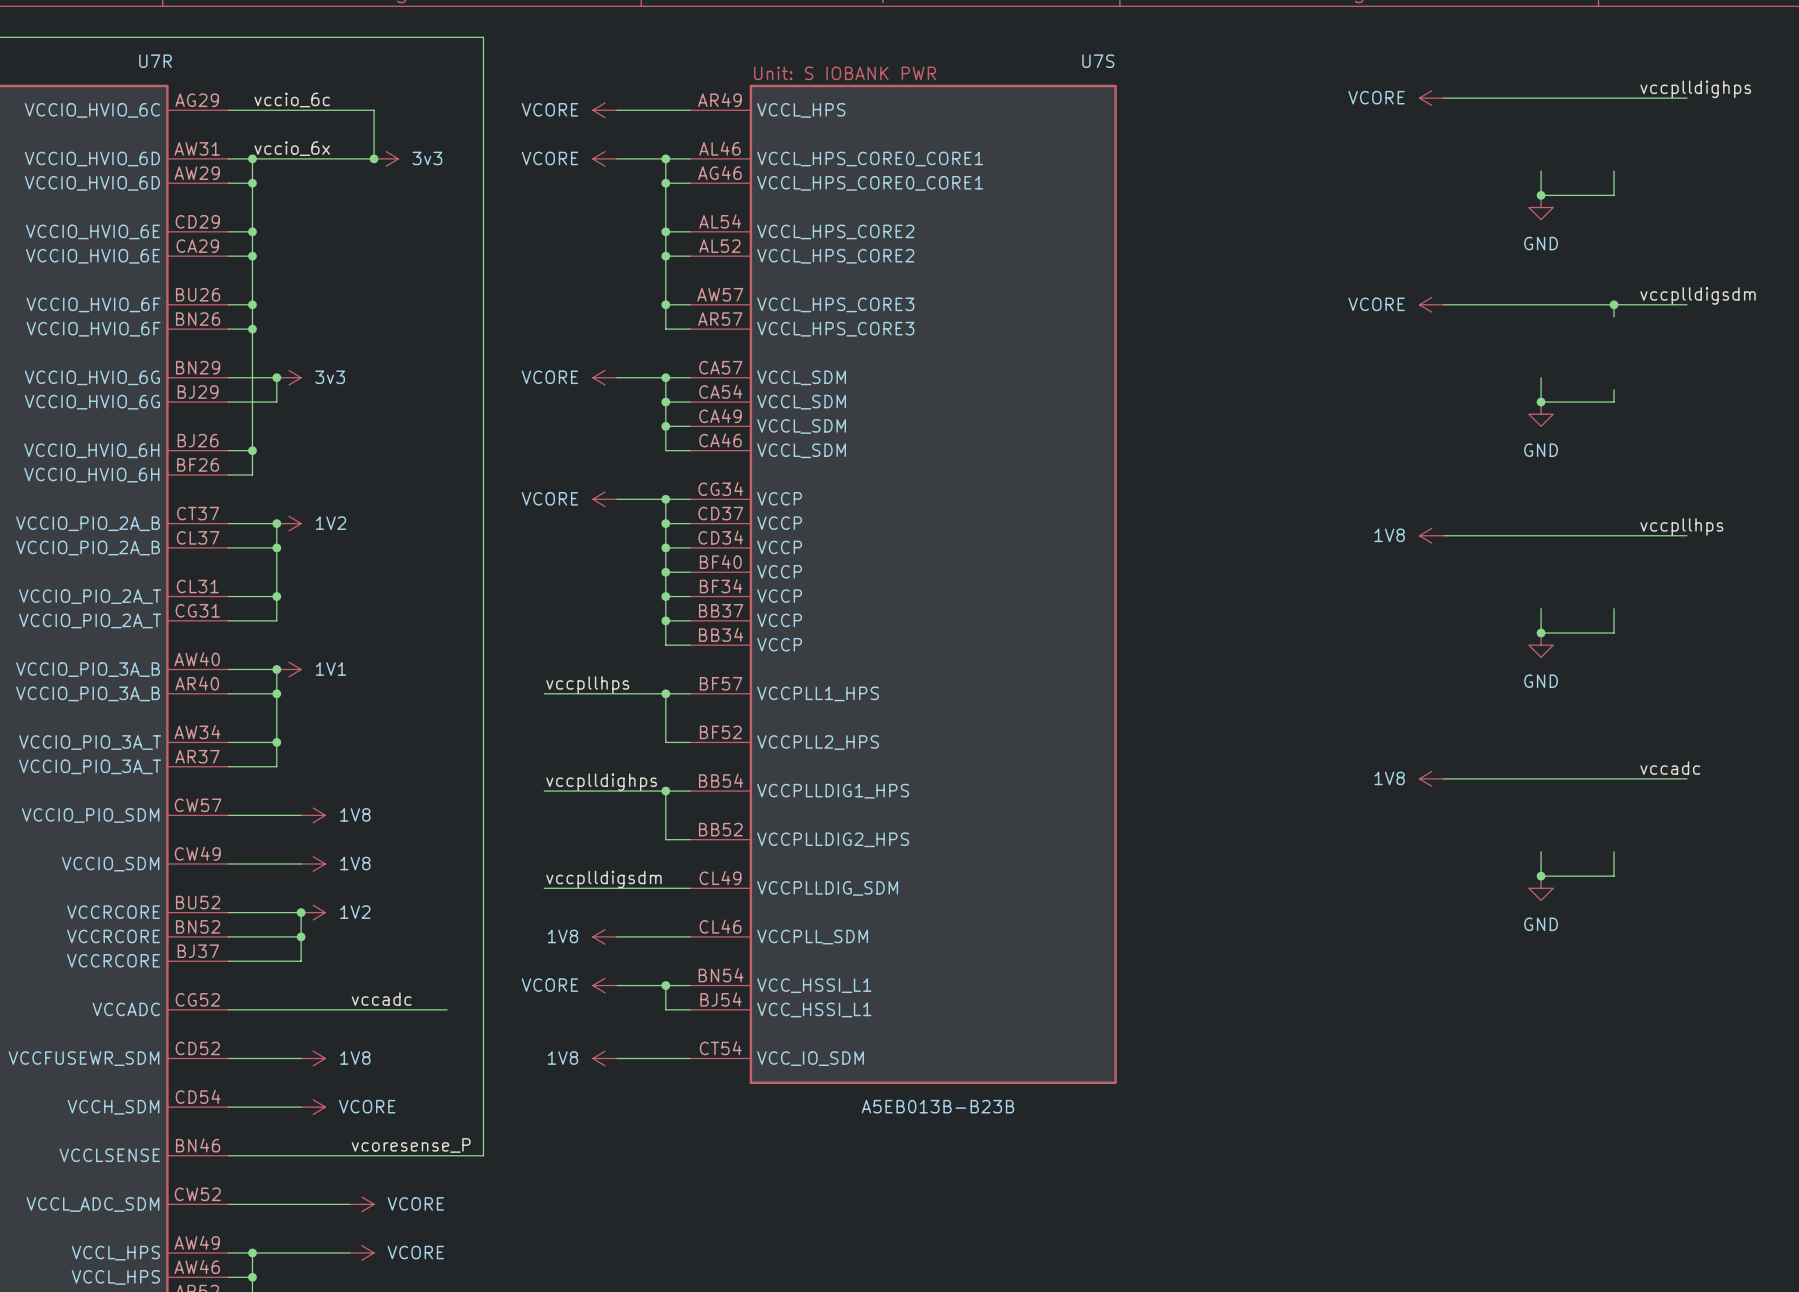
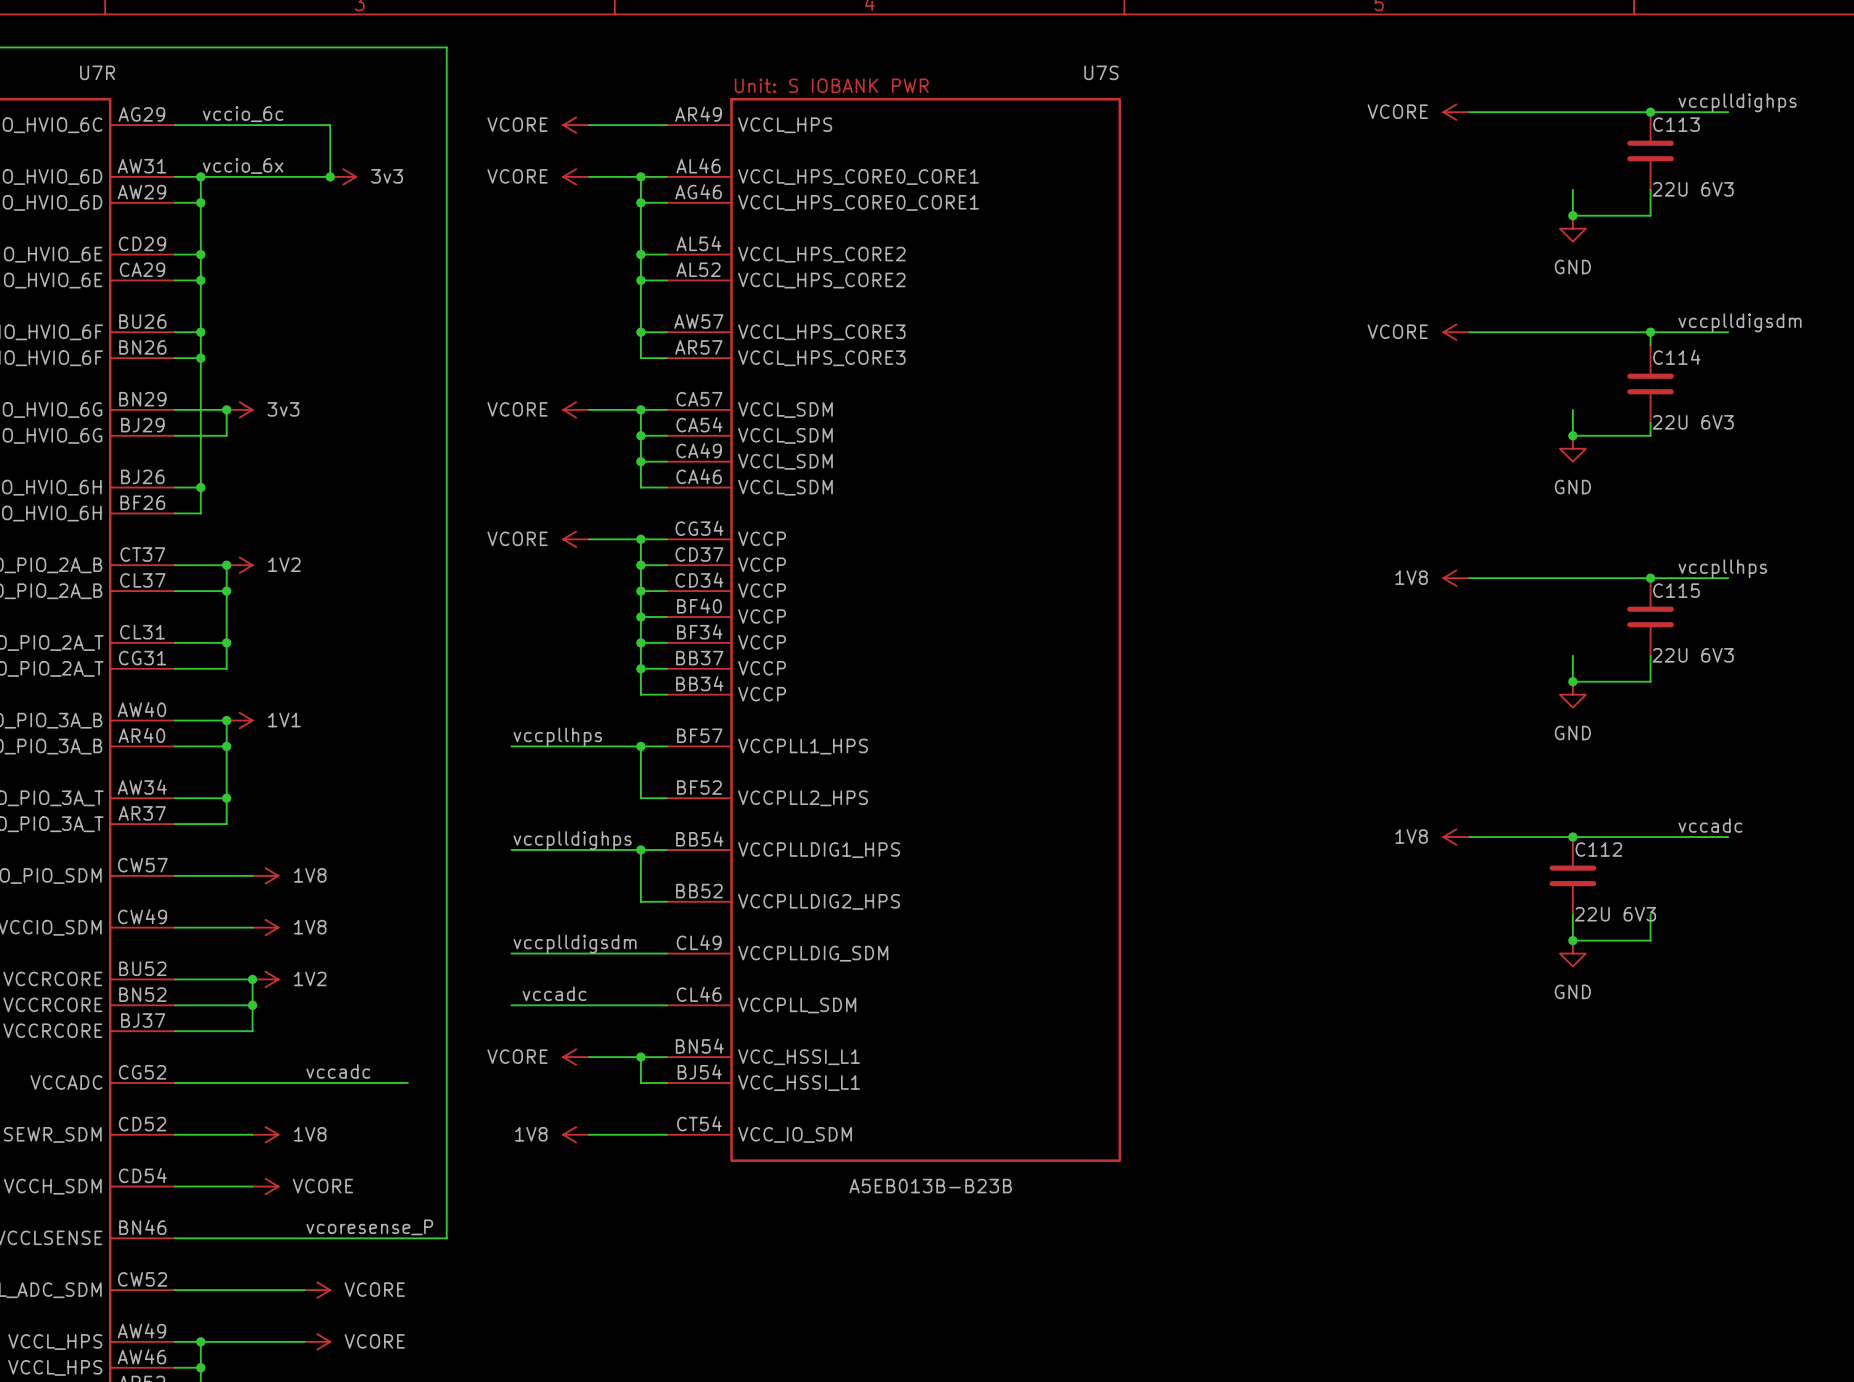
junction: none -> (1650, 112)
C113: none -> 22U 6V3 (1650, 151)
C114: none -> 22U 6V3 (1650, 383)
junction: none -> (1650, 578)
C115: none -> 22U 6V3 (1650, 616)
junction: none -> (1572, 837)
C112: none -> 22U 6V3 (1572, 875)
label: none -> vccadc (554, 993)
wire: none -> (511, 1005) (589, 1005)
power symbol: 1V8 (605, 936) -> none

